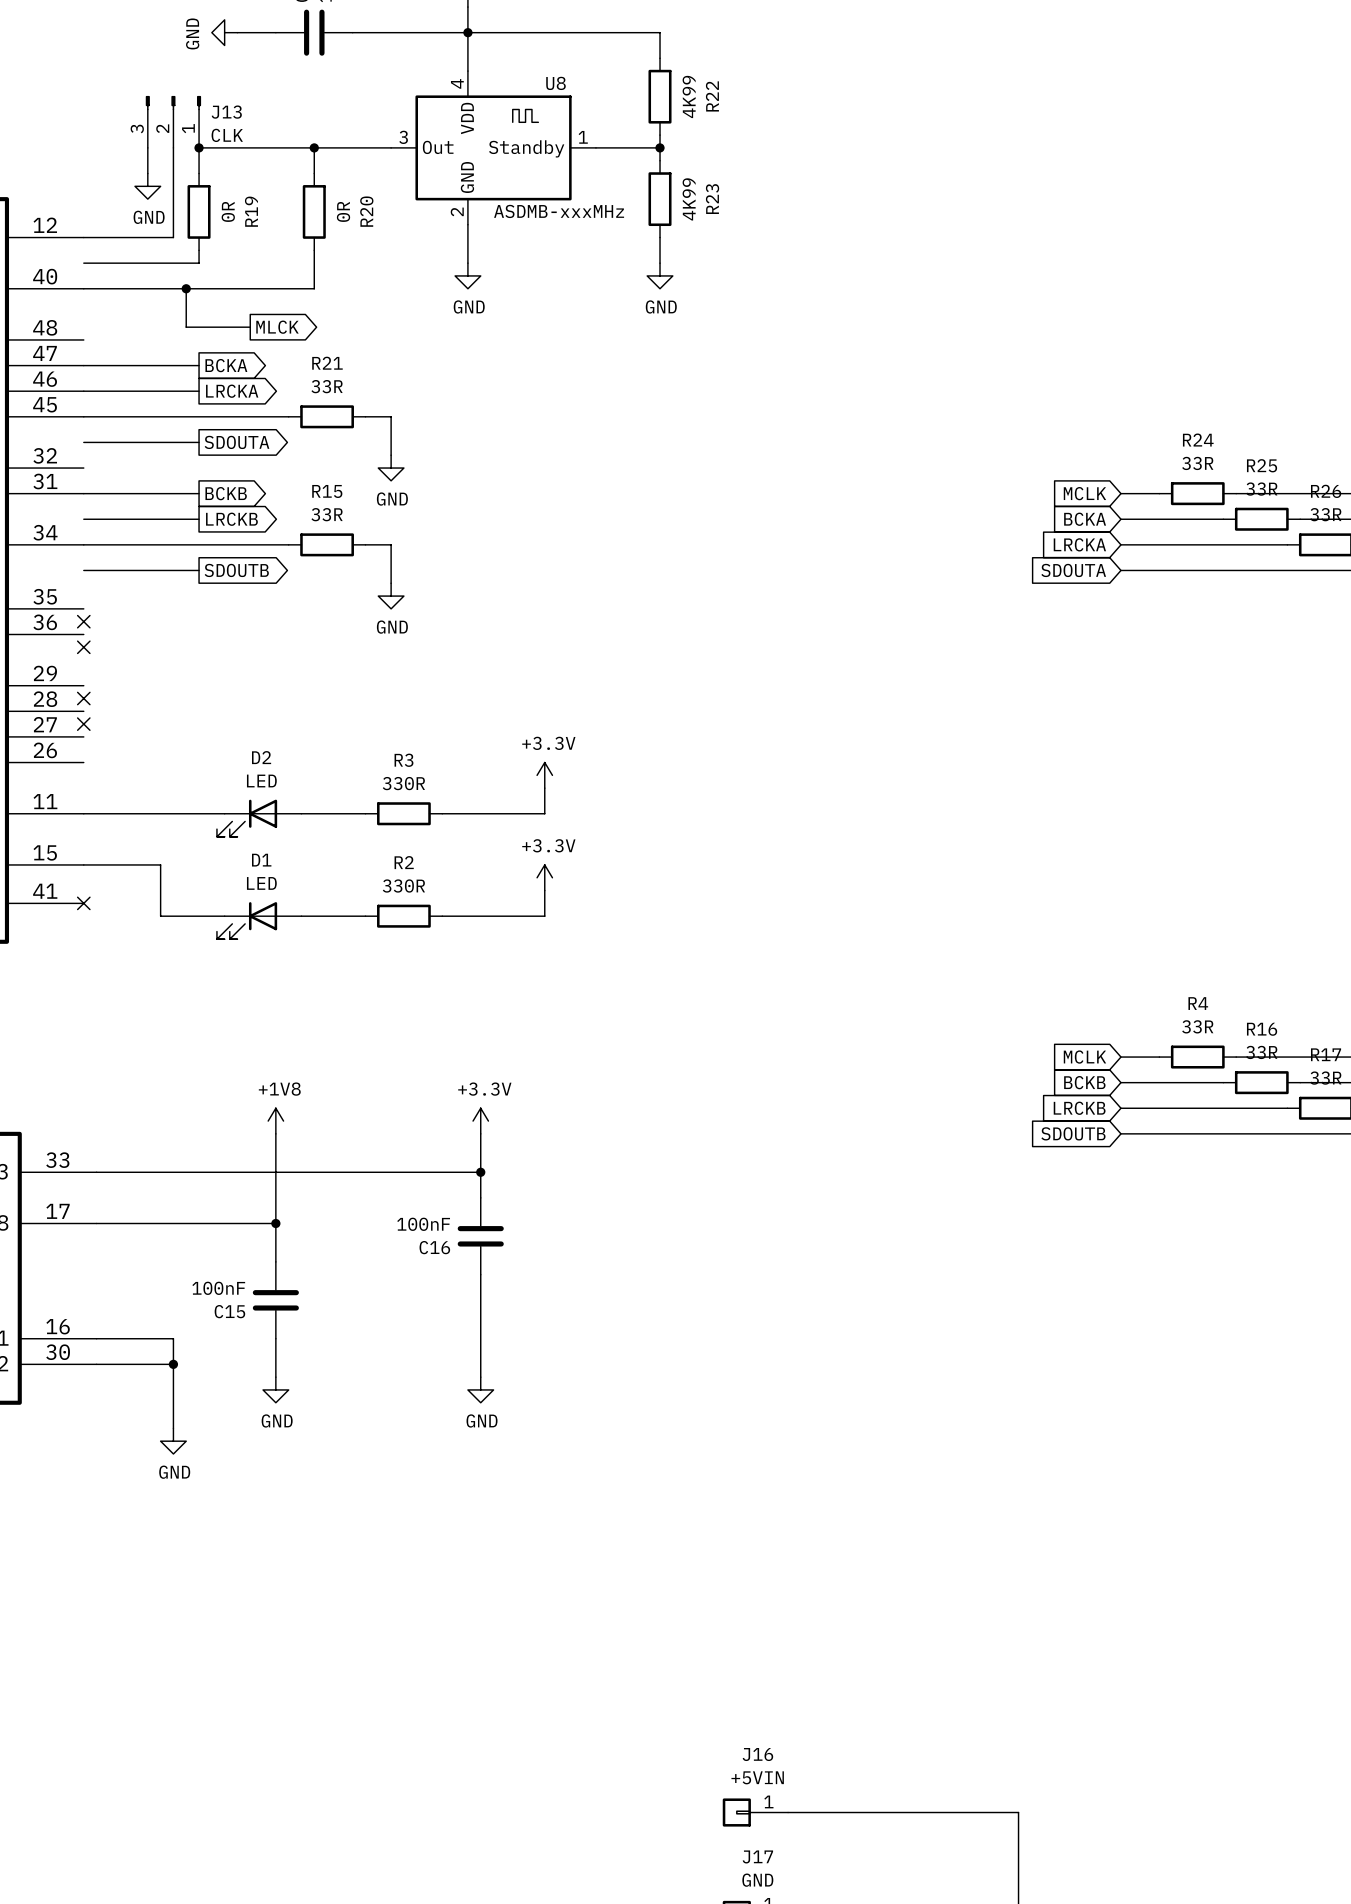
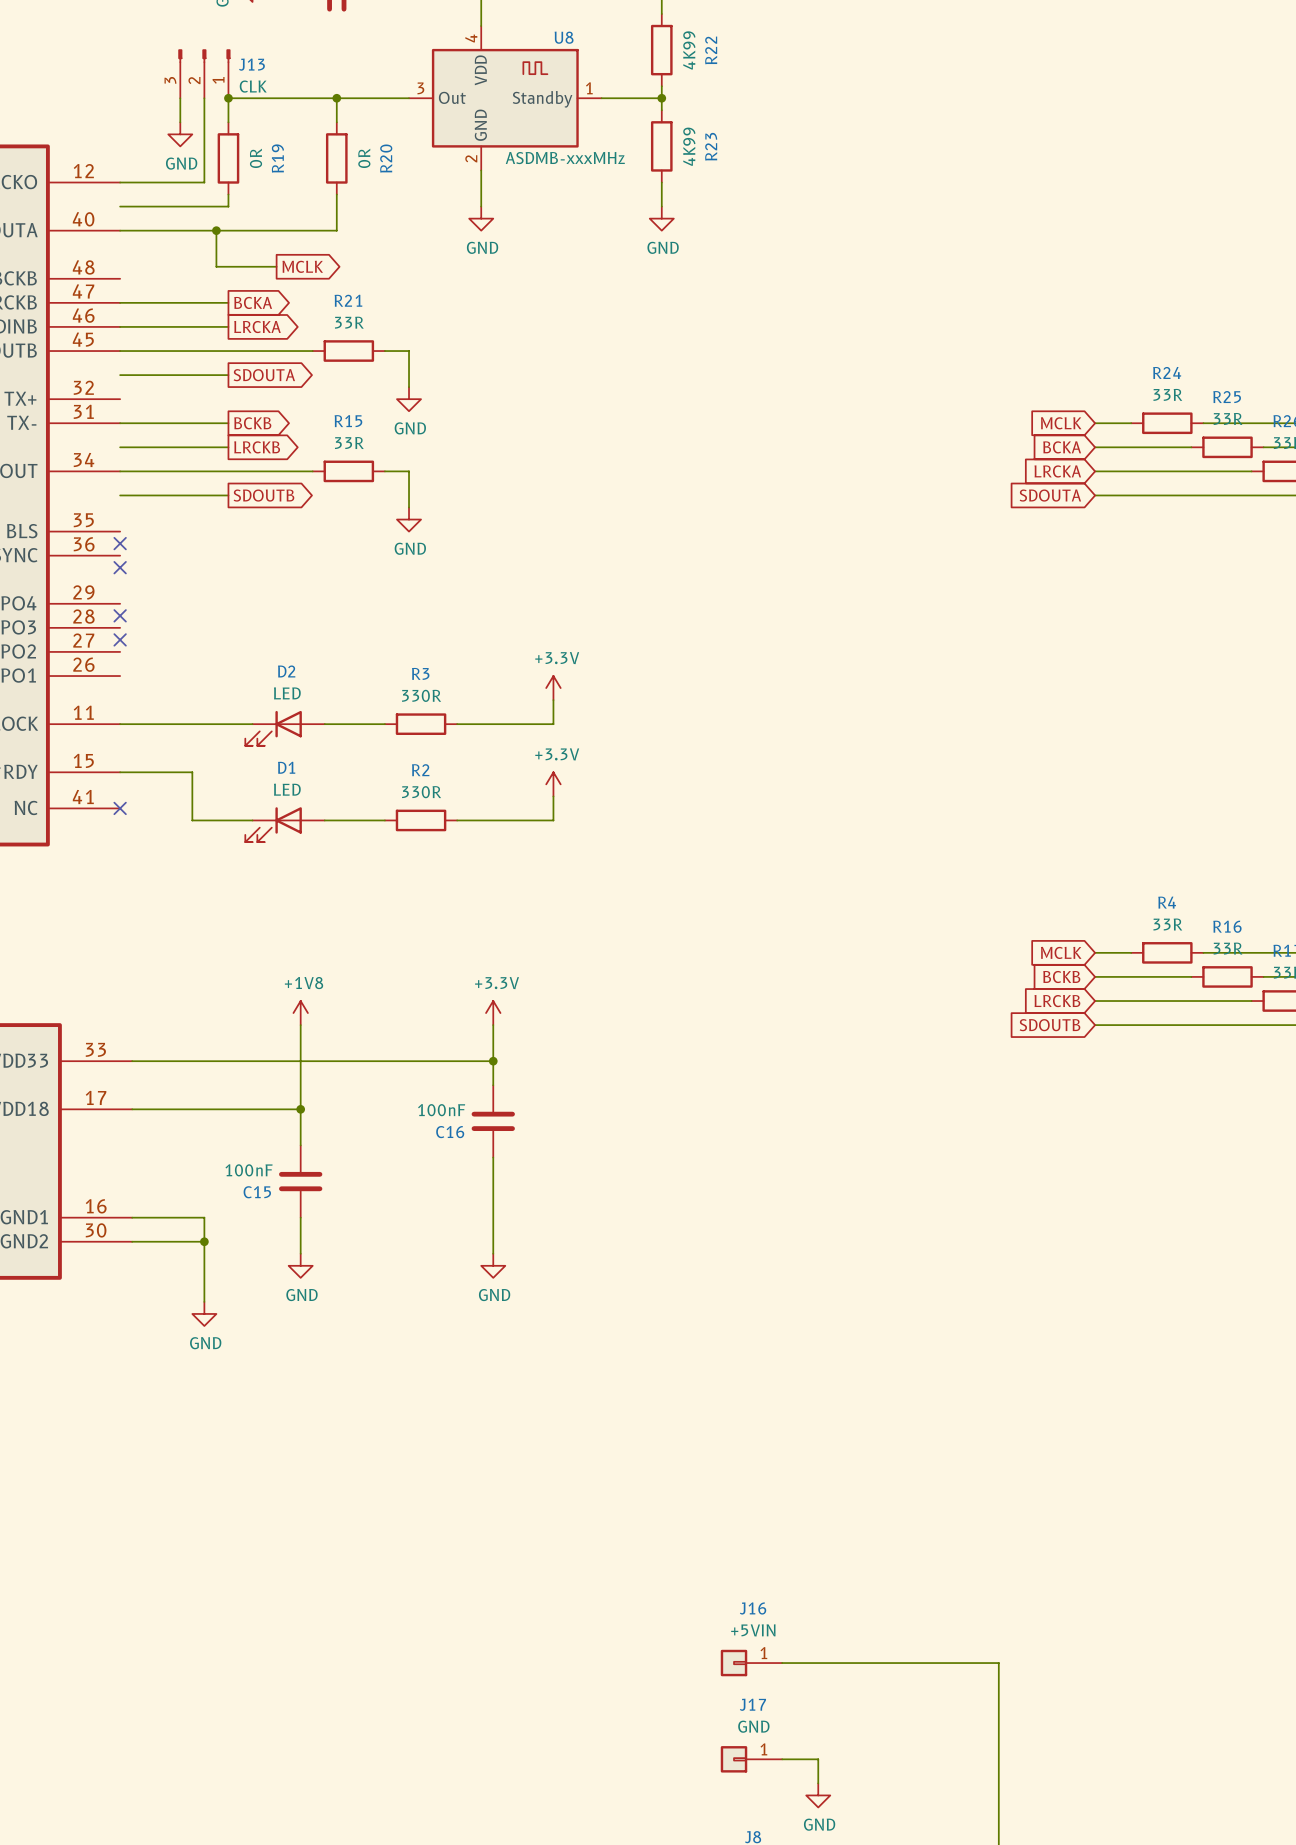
global label: MLCK (277, 327) -> MCLK (302, 266)

